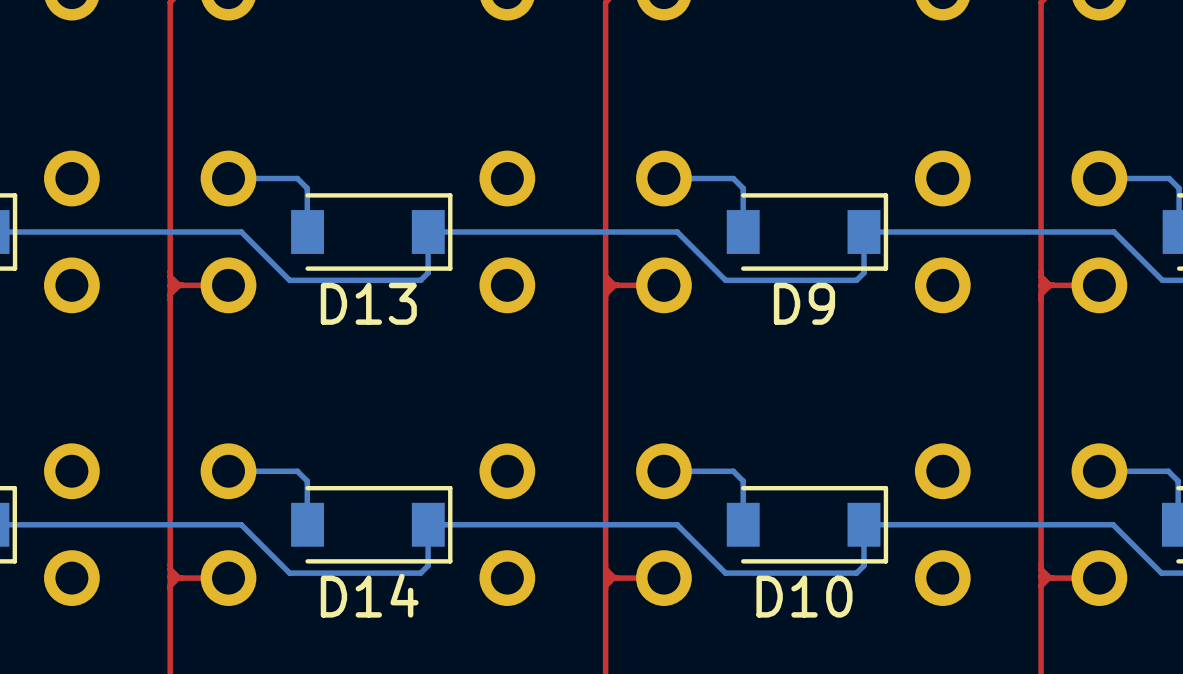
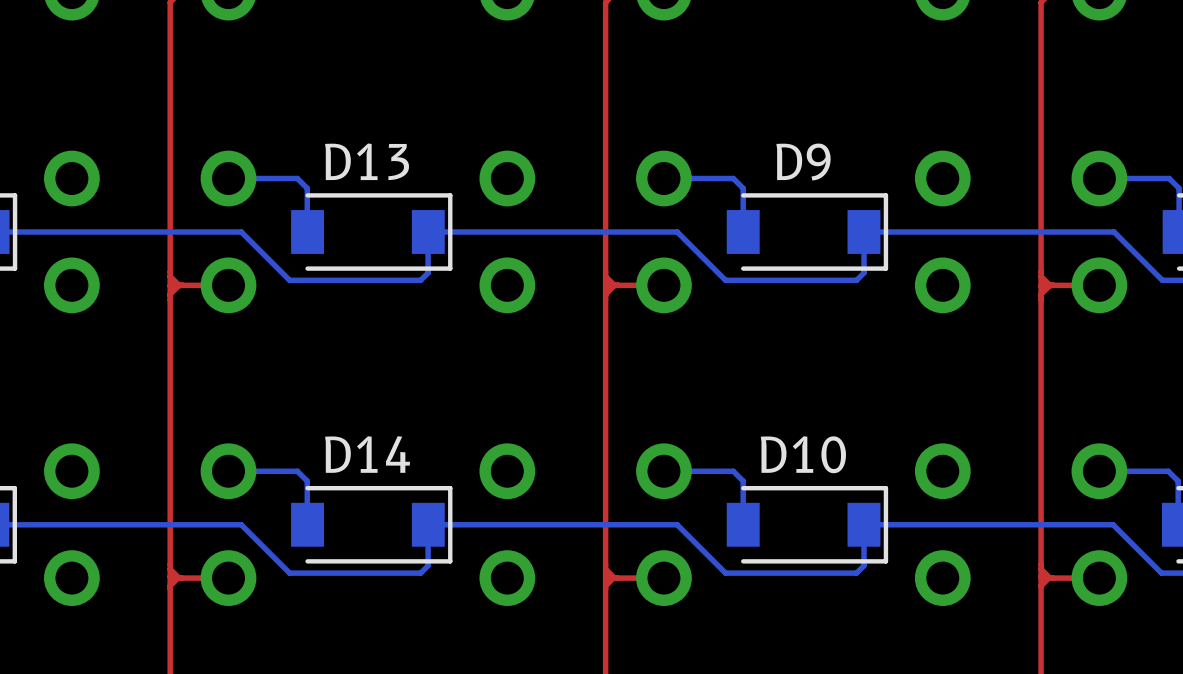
D13 name position: D13 (368, 303) -> D13 (367, 161)
D9 name position: D9 (804, 303) -> D9 (803, 162)
D14 name position: D14 (369, 595) -> D14 (367, 454)
D10 name position: D10 (804, 596) -> D10 (803, 454)

